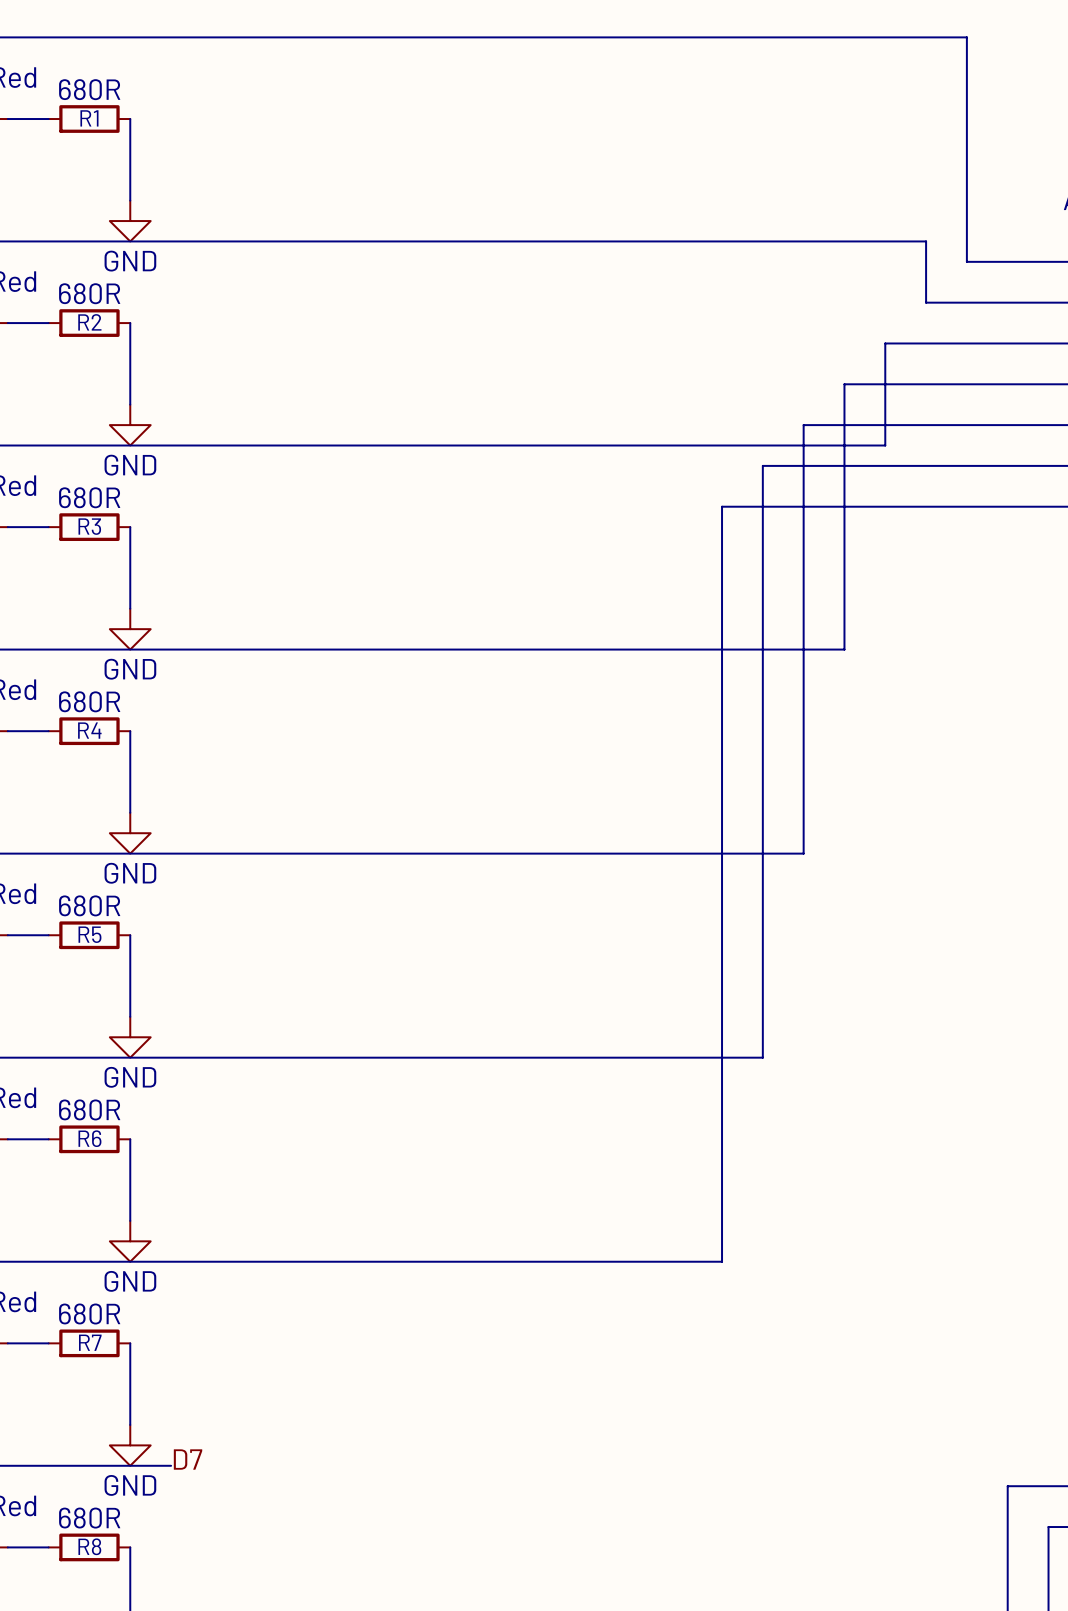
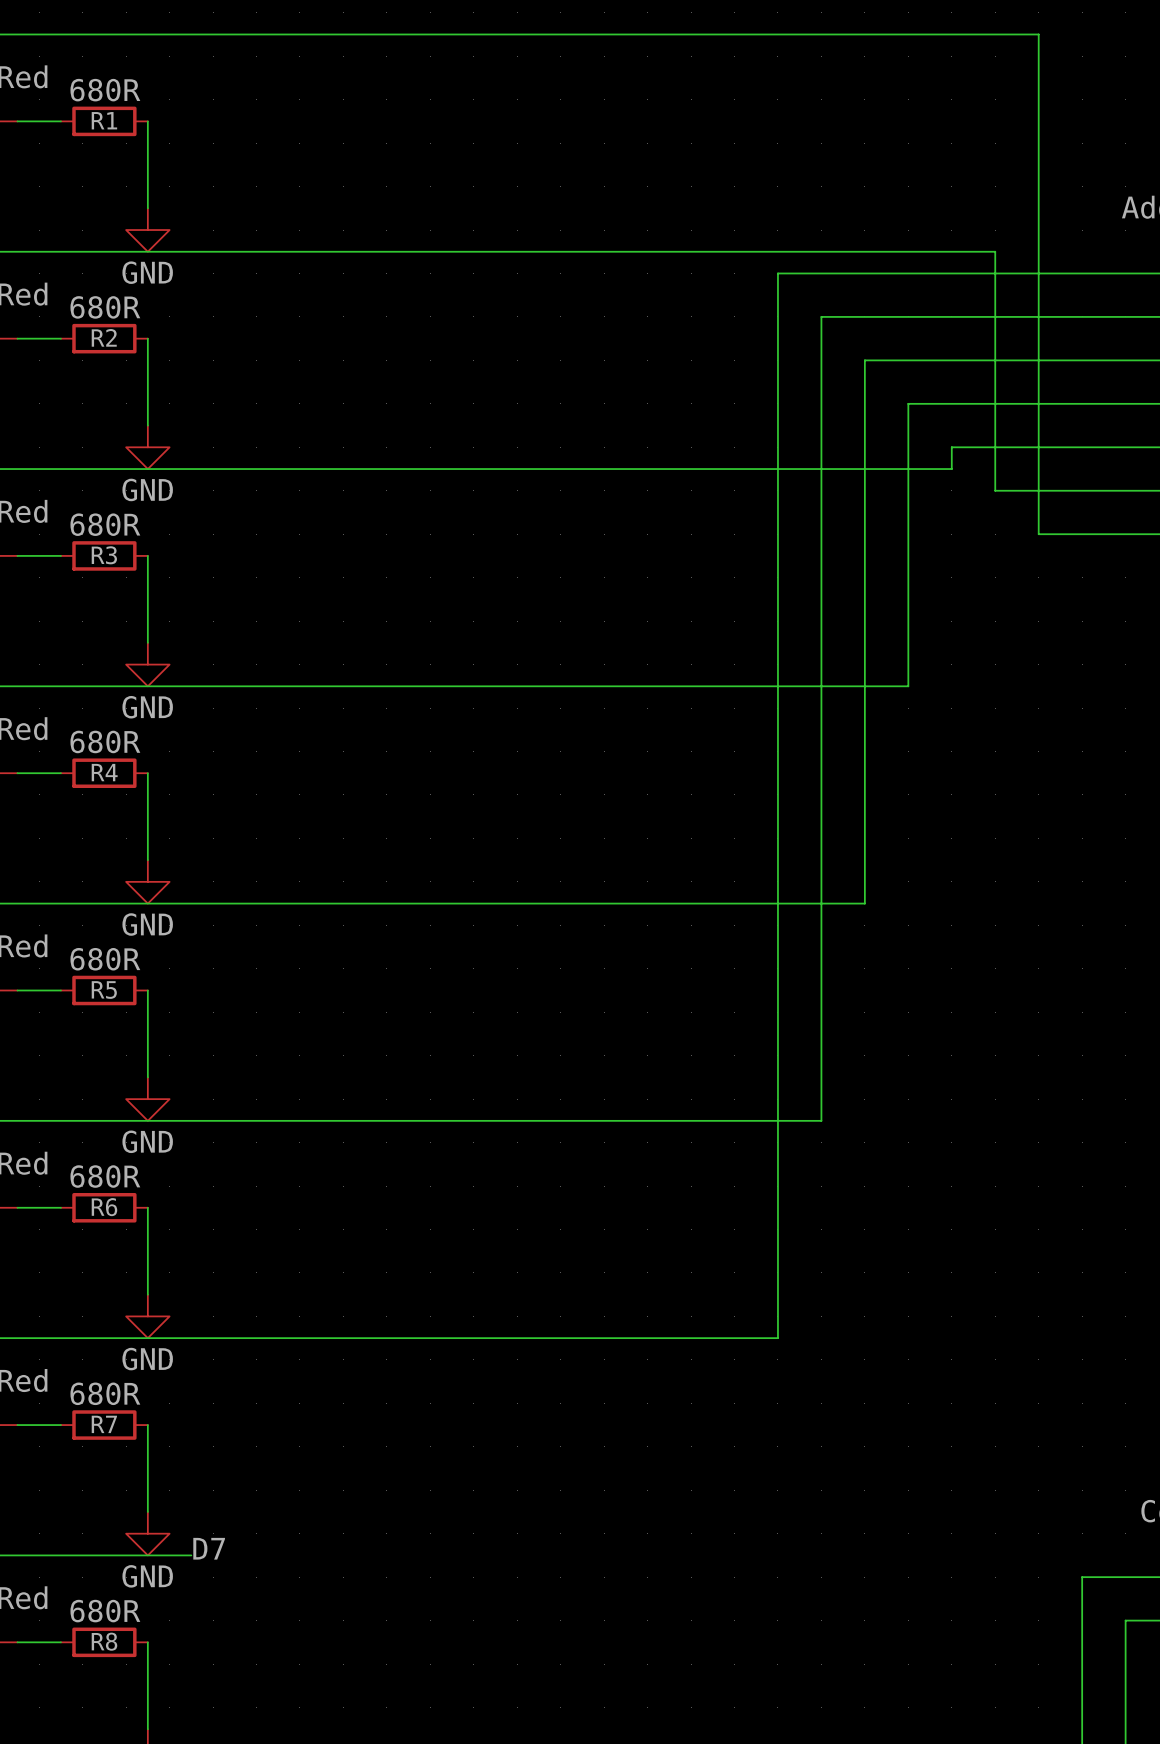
wire: (885, 343) (885, 425) (803, 425) -> (951, 360) (864, 360) (864, 447)
wire: (762, 465) (926, 465) -> (821, 490) (821, 316) (995, 316) (995, 490)
wire: (722, 506) (966, 506) -> (777, 534) (777, 273) (1038, 273) (1038, 534)

